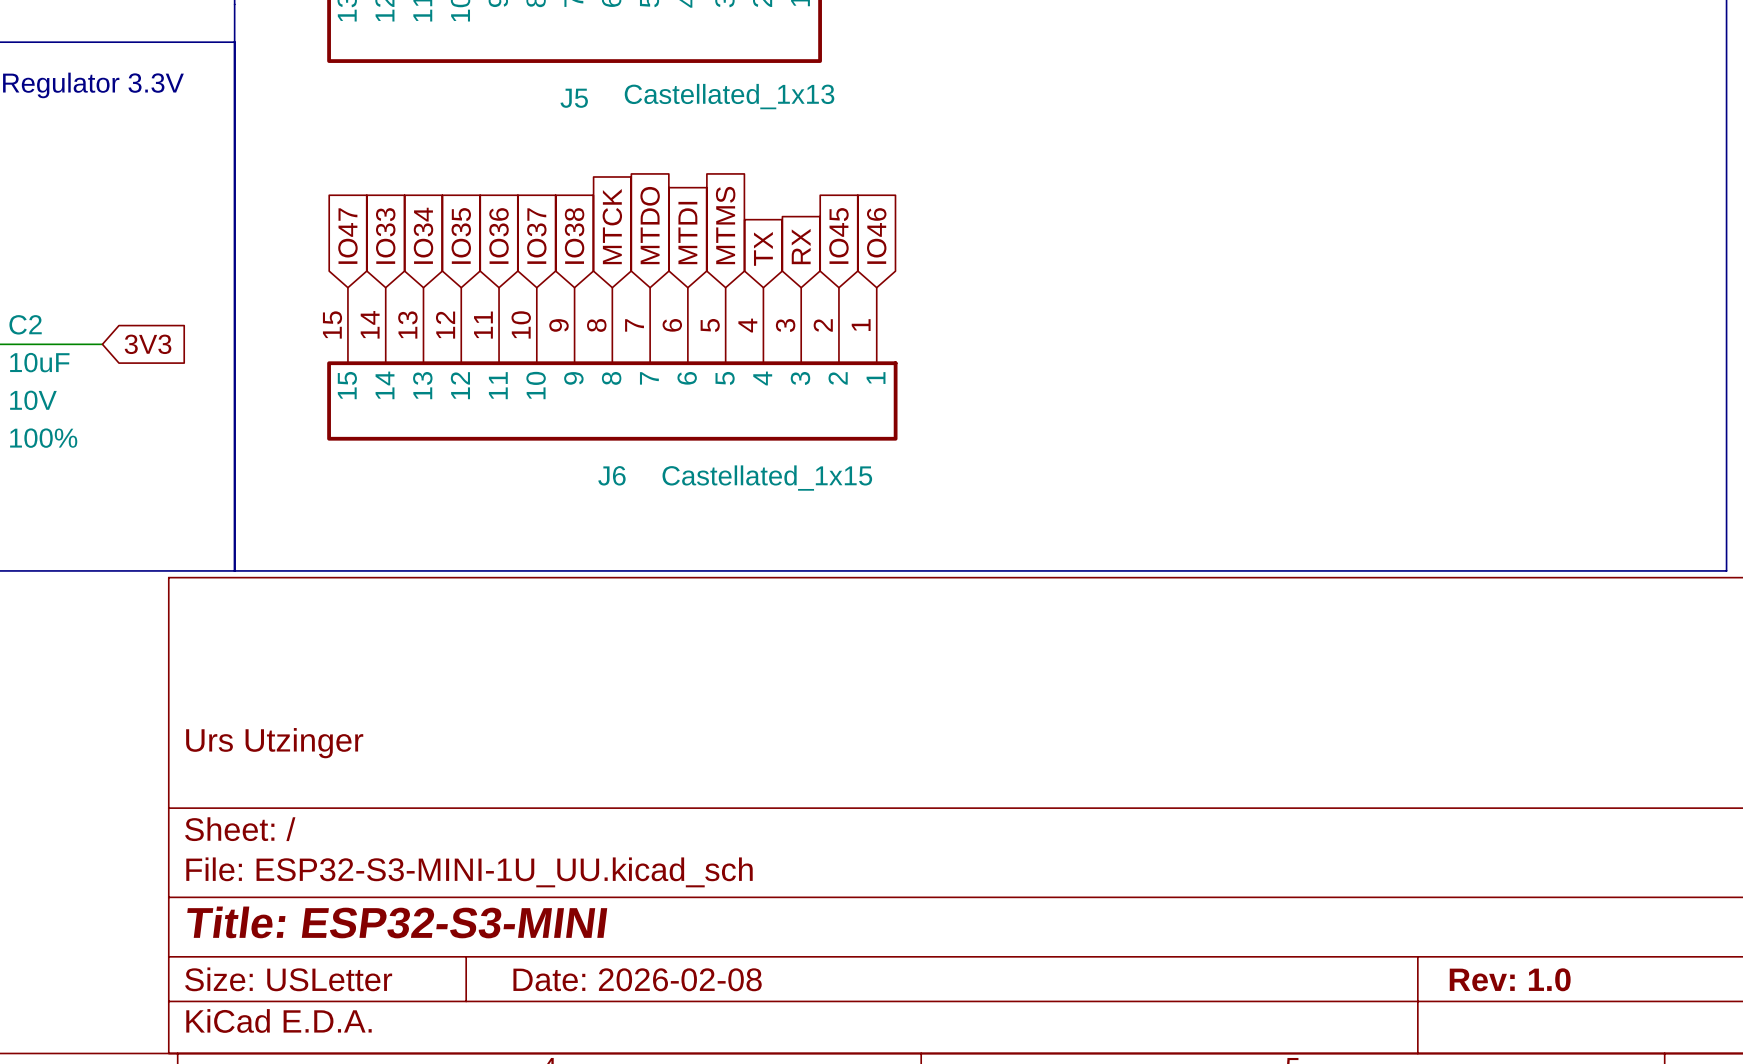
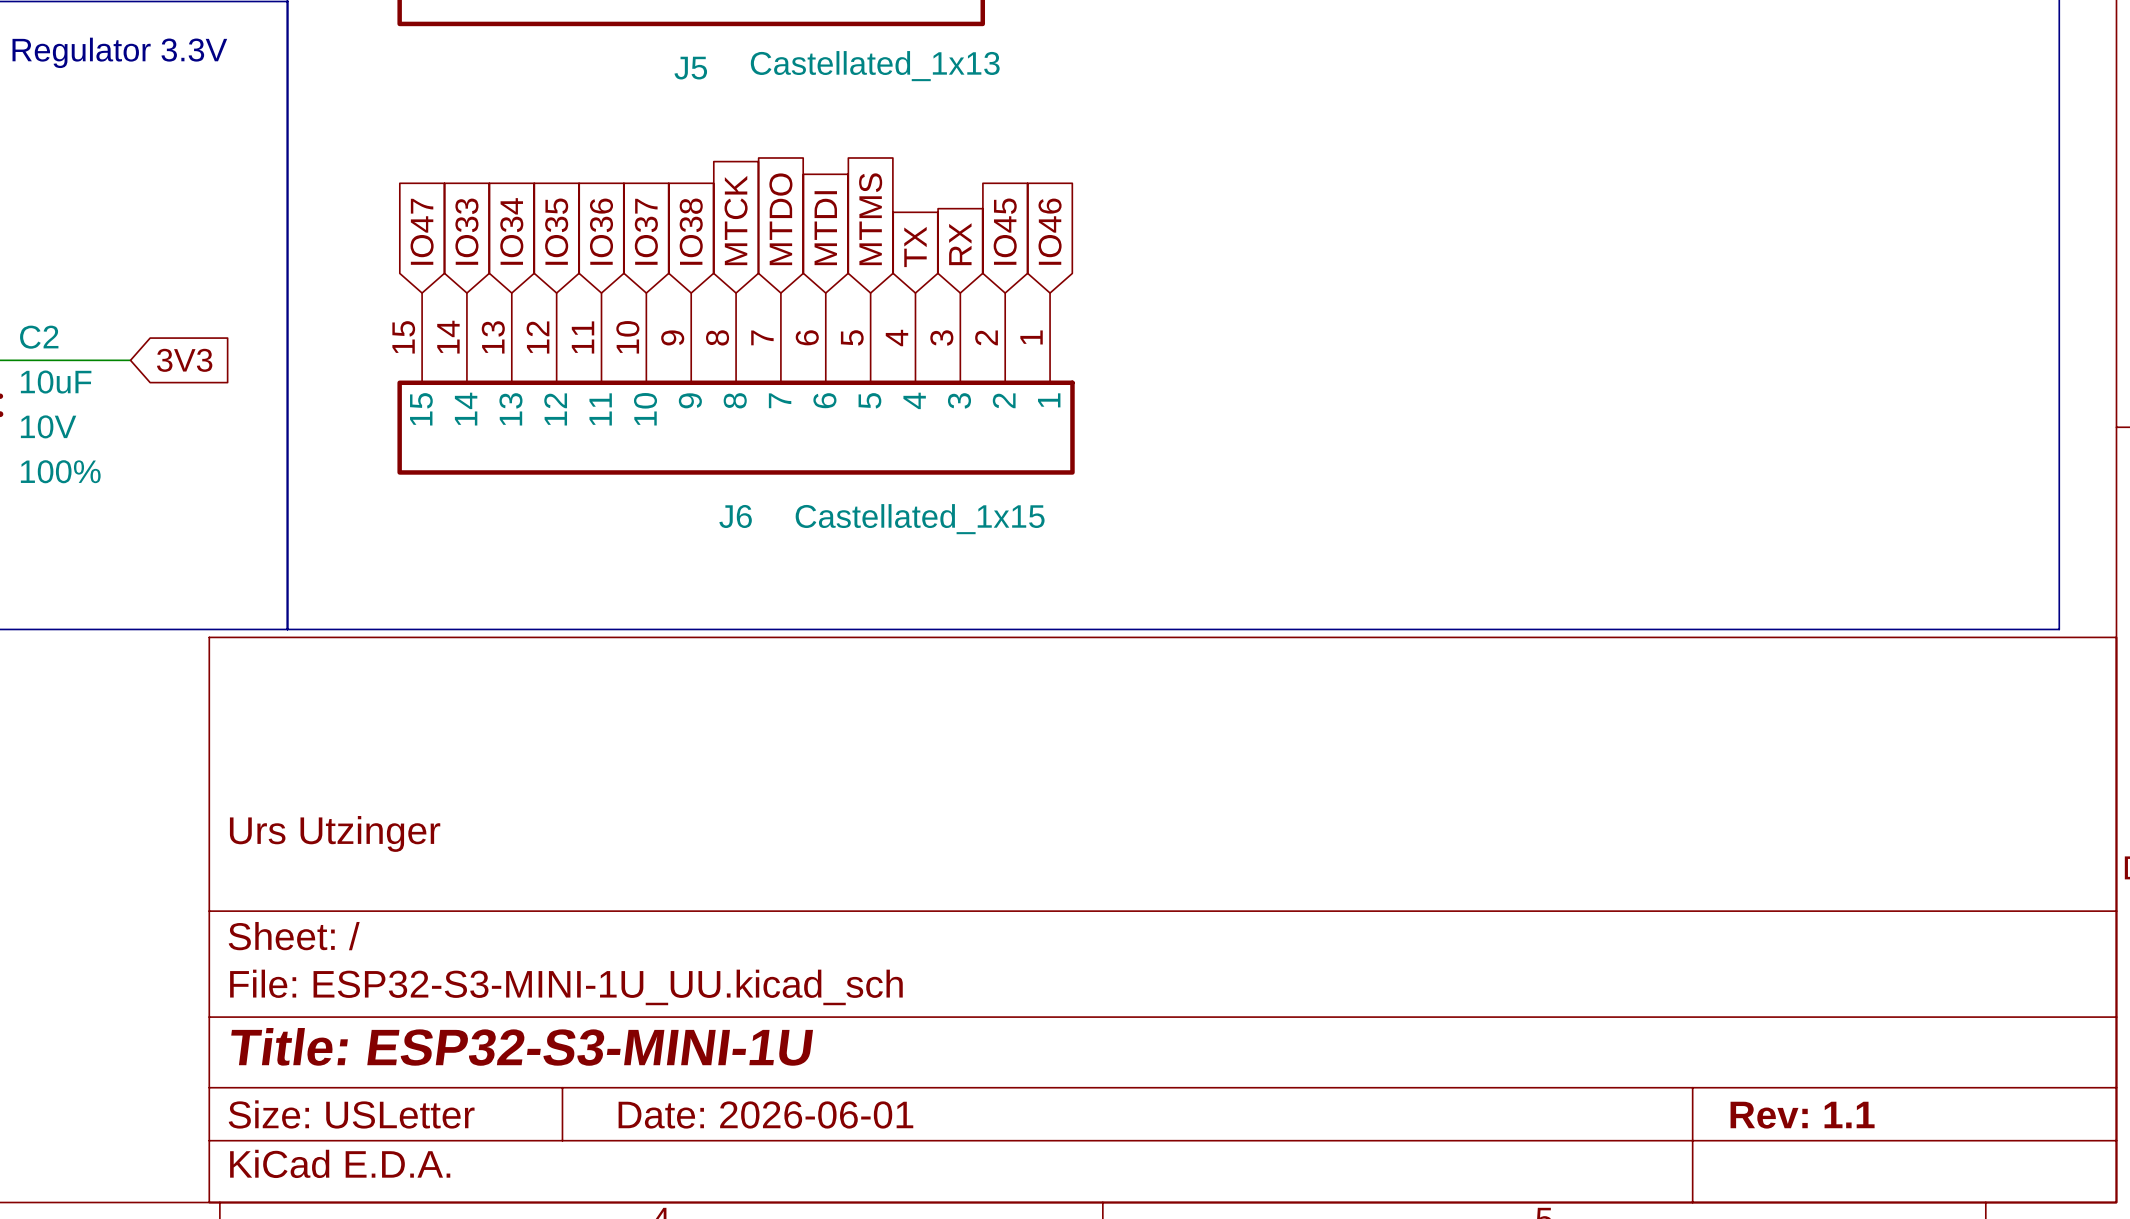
title block: Title: ESP32-S3-MINI (397, 922) -> Title: ESP32-S3-MINI-1U (522, 1046)
title block: Date: 2026-02-08 (637, 979) -> Date: 2026-06-01 (765, 1114)
title block: Rev: 1.0 (1510, 979) -> Rev: 1.1 (1802, 1115)

